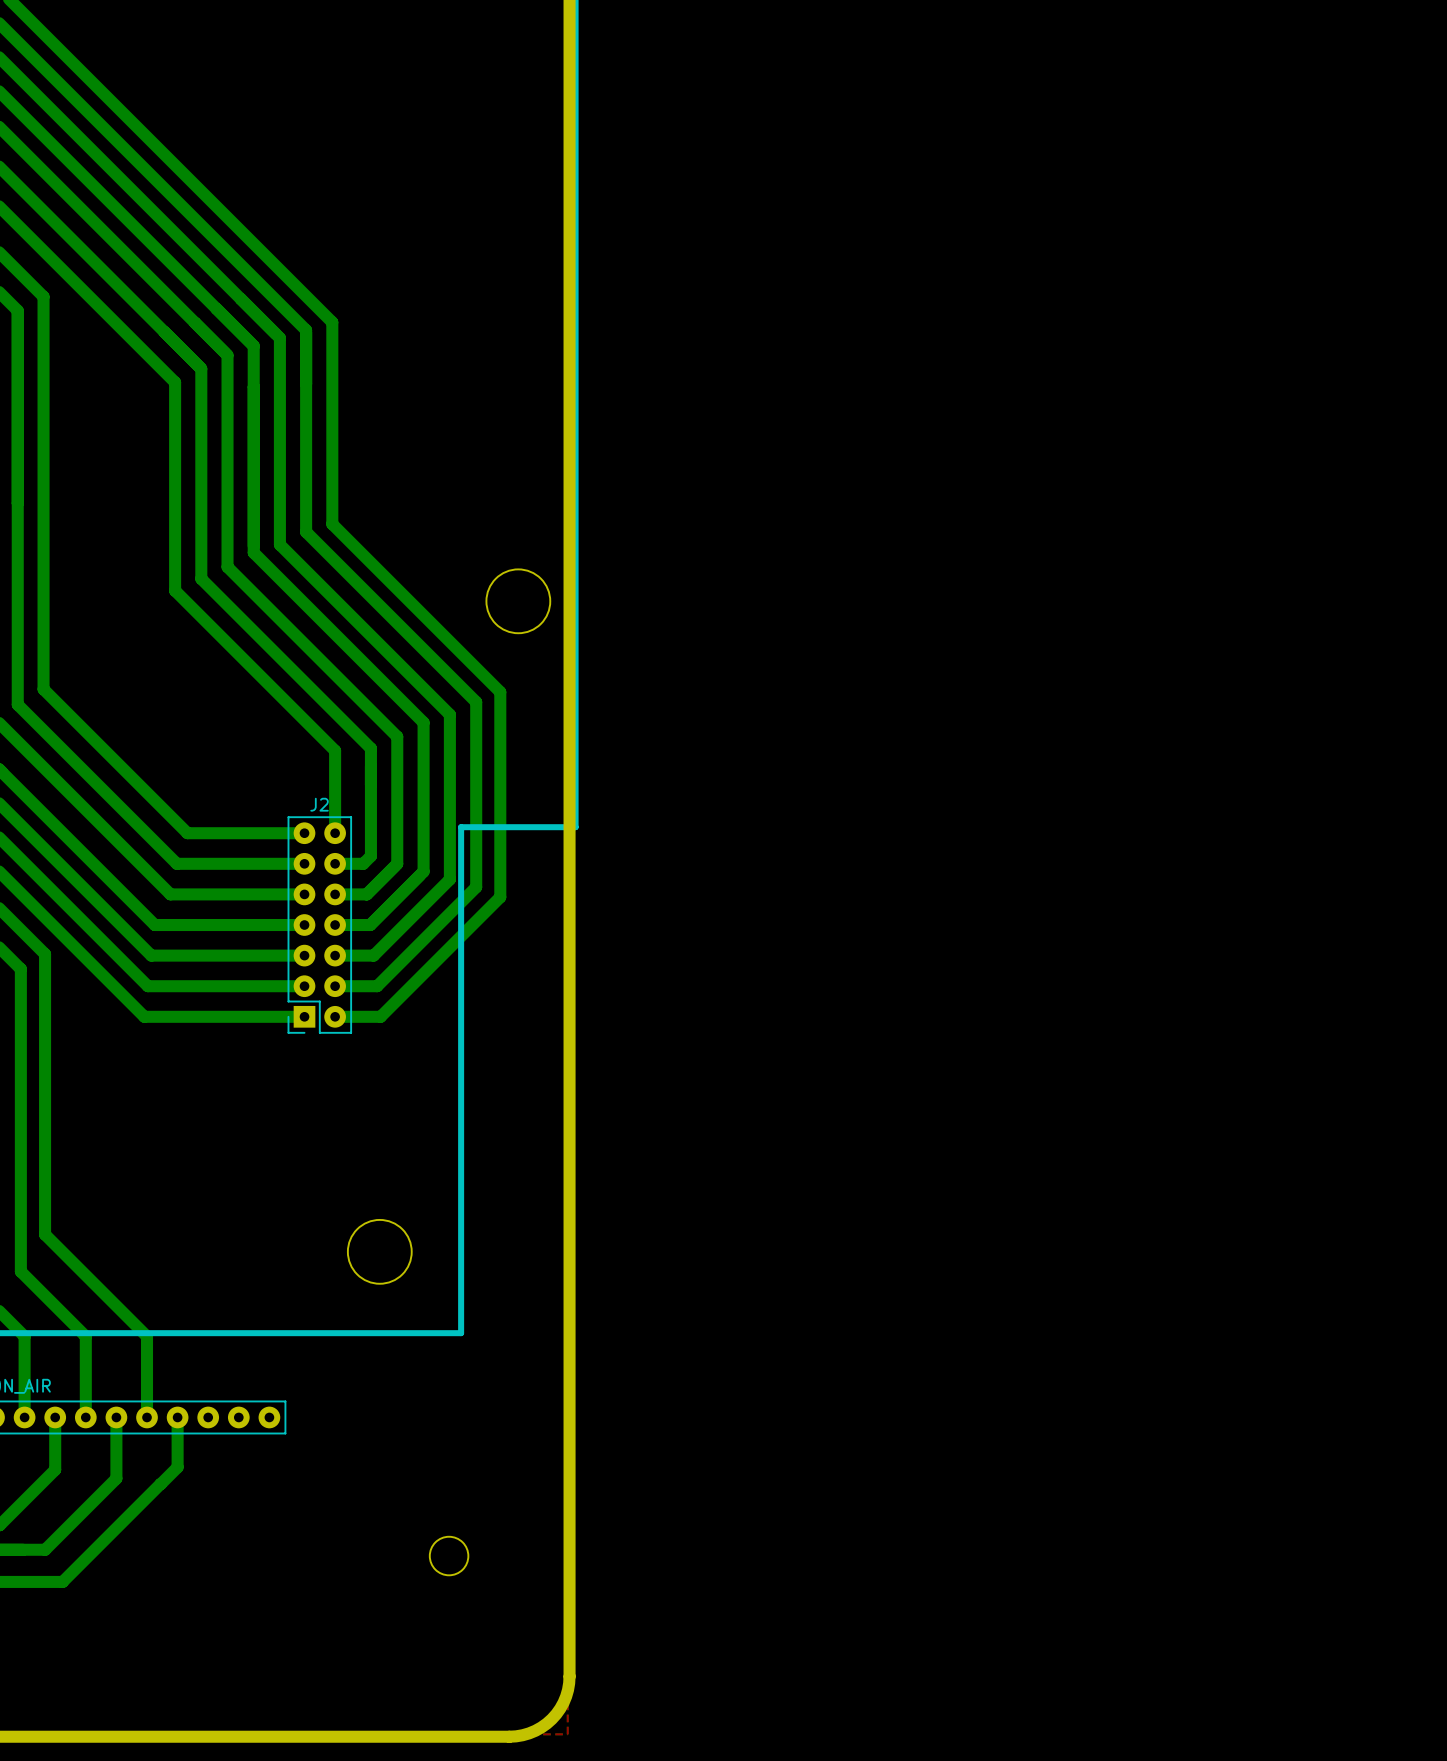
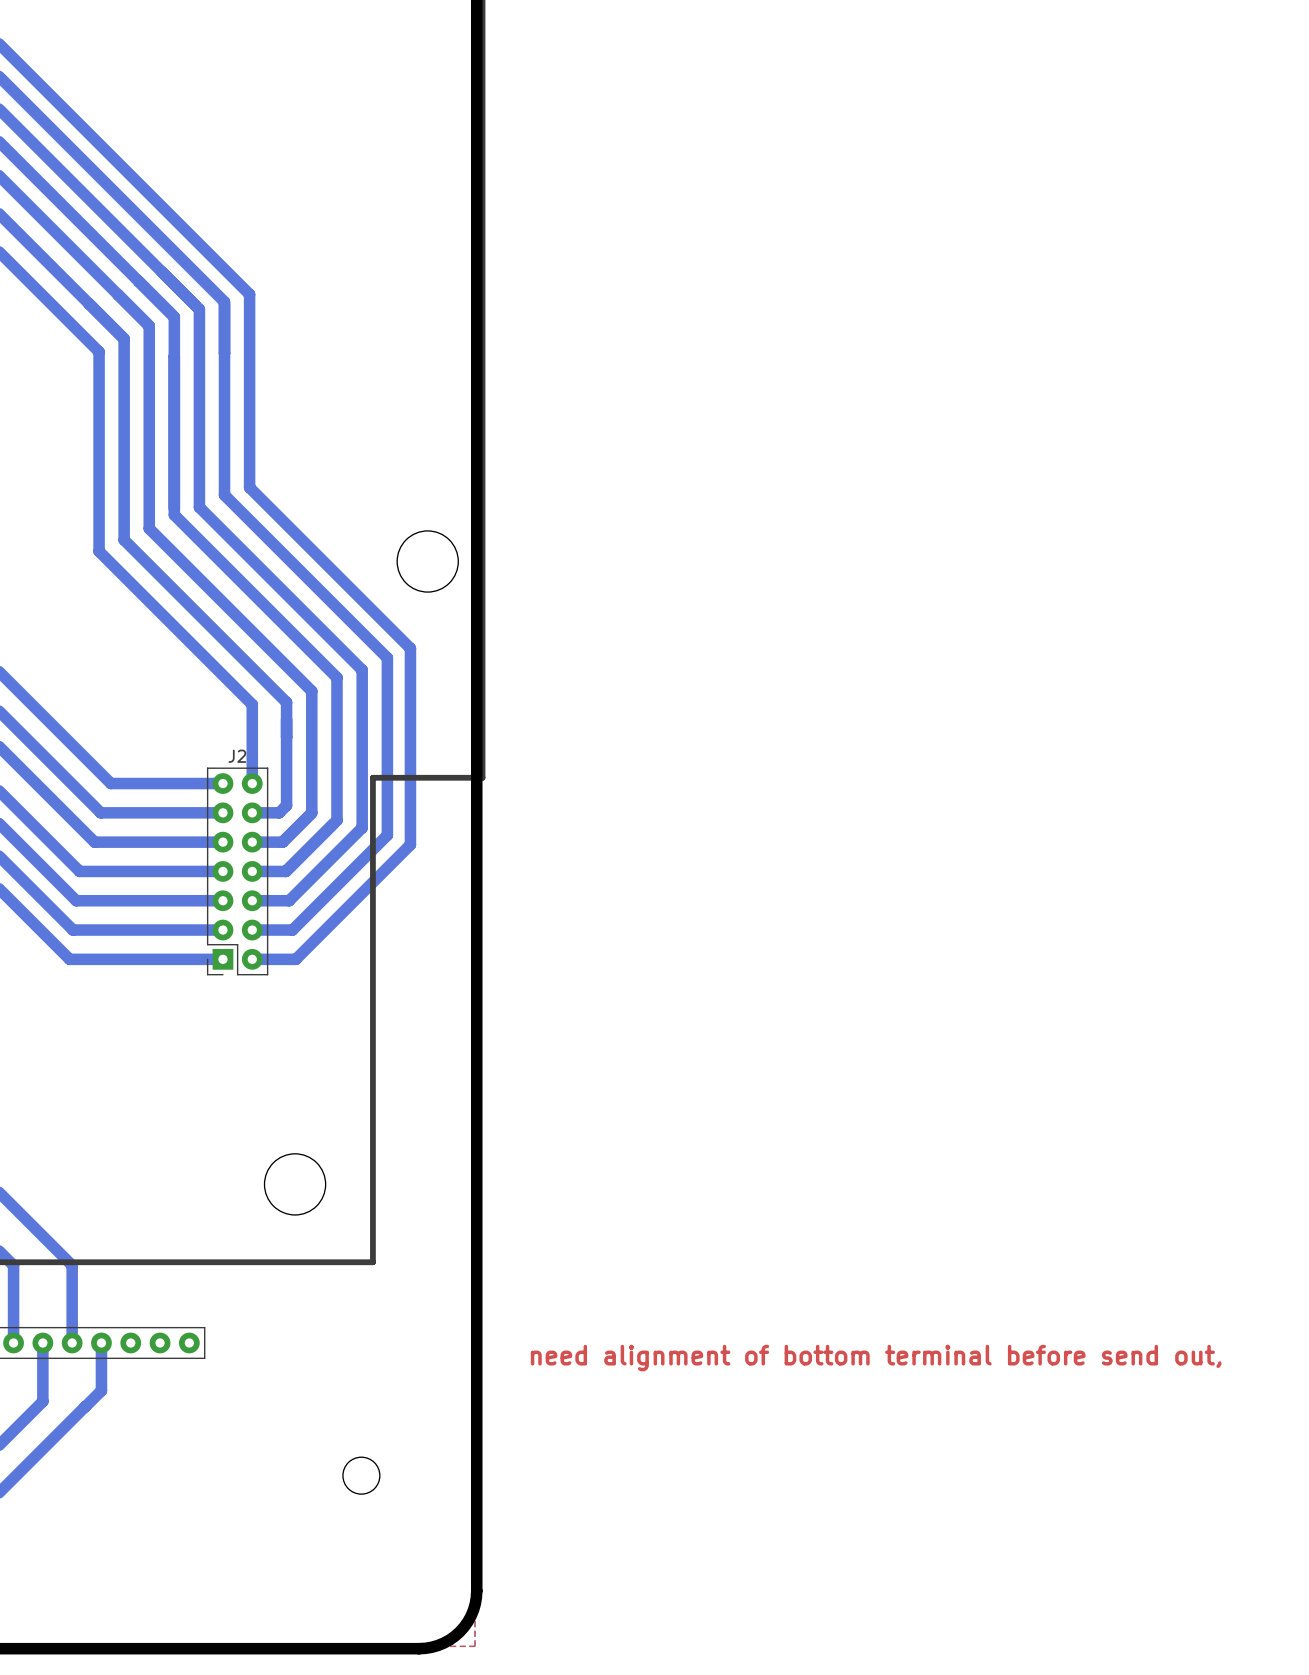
text: none -> need alignment of bottom terminal before send out, (876, 1358)

